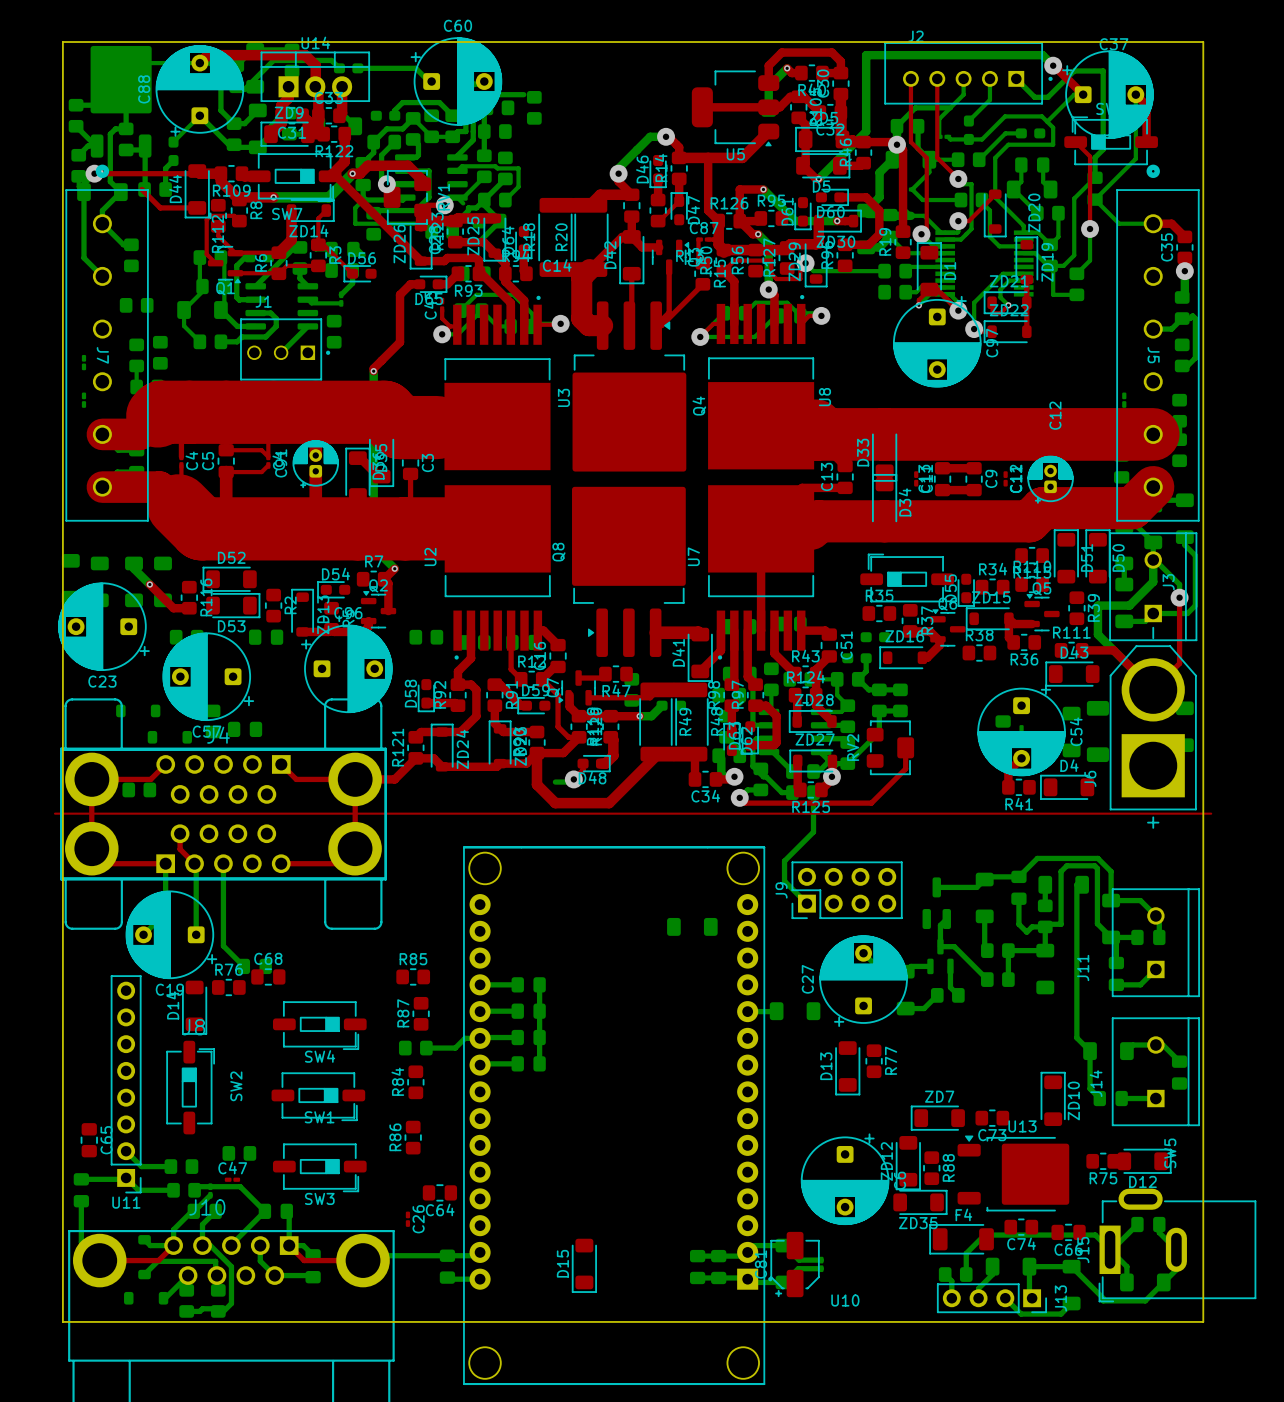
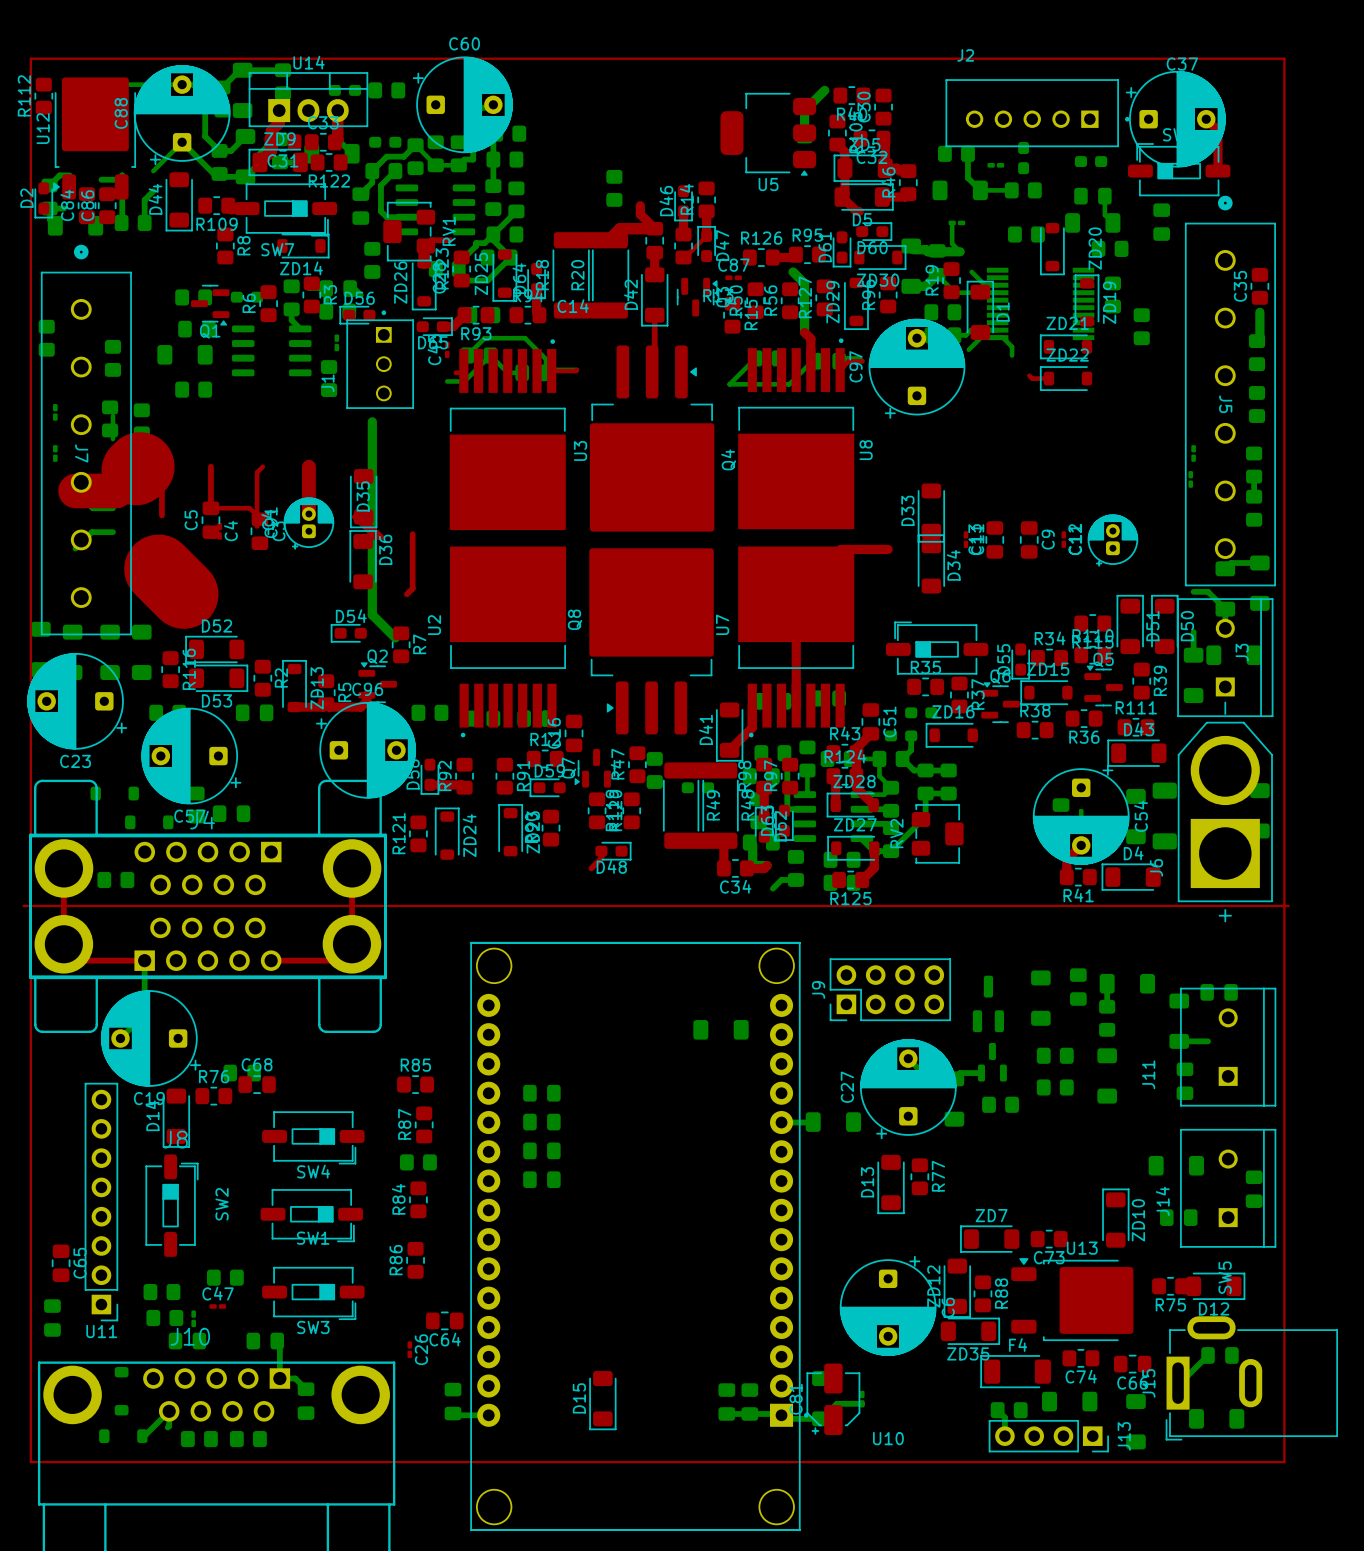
top track: none -> (30, 58) (1284, 58) (1284, 1462) (30, 1462) (30, 58)
board edge: (62, 42) (1203, 42) (1203, 1321) (62, 1321) (62, 42) -> none
top track: (199, 63) (207, 55) (305, 55) (315, 65) (315, 86) (318, 89) (318, 128) (323, 134) (307, 134) (307, 121) (302, 115) -> none
top track: (1053, 65) (1083, 94) -> none
bottom track: (1053, 65) (1042, 55) (866, 55) (866, 131) (818, 178) -> none
via: (1053, 65) -> none
bottom track: (339, 68) (331, 60) (273, 60) (244, 89) (236, 89) -> none
bottom track: (357, 68) (415, 68) (431, 84) -> none
part: none -> (386, 90)
top track: (787, 68) (791, 73) (801, 73) -> none
via: (787, 68) -> none
top track: (822, 73) (840, 73) (840, 61) (831, 52) (781, 52) (768, 65) (768, 83) -> none
J2 position: (968, 73) -> (1037, 113)
top track: (910, 78) (910, 142) (926, 157) (926, 228) (921, 234) -> none
top track: (937, 78) (937, 157) (958, 178) -> none
bottom track: (963, 78) (963, 94) (939, 119) (939, 136) -> none
bottom track: (989, 78) (989, 99) (968, 121) -> none
bottom track: (1016, 78) (1034, 97) (1047, 97) (1074, 70) (1103, 70) (1103, 149) (1095, 157) (1095, 177) (1074, 198) (1074, 255) (1063, 265) (1047, 265) (1035, 253) (1023, 253) -> none
bottom track: (523, 94) (479, 94) (473, 100) (473, 139) (457, 157) -> none
top track: (840, 94) (840, 138) (844, 142) (895, 142) (903, 149) (903, 231) -> none
bottom track: (1083, 94) (1074, 94) (1047, 121) -> none
bottom track: (1135, 94) (1135, 158) (1095, 199) (1119, 223) (1153, 223) -> none
U12 side: bottom (121, 101) -> top (94, 138)
bottom track: (76, 105) (95, 105) (121, 79) (126, 84) (126, 128) (115, 128) (110, 134) (110, 181) (120, 192) (102, 210) (102, 223) (123, 244) (131, 244) -> none
part: (534, 107) -> none
top track: (702, 107) (779, 107) (790, 96) (804, 96) (819, 112) -> none
bottom track: (950, 107) (915, 107) (896, 126) (896, 144) (892, 149) (892, 159) -> none
C86 side: bottom (76, 115) -> top (107, 205)
bottom track: (394, 115) (394, 110) (402, 102) (439, 102) (452, 115) -> none
bottom track: (76, 126) (95, 146) -> none
top track: (768, 131) (742, 157) (679, 157) (679, 147) (668, 136) (666, 136) -> none
bottom track: (1021, 133) (1005, 133) (979, 159) -> none
top track: (344, 134) (344, 161) (330, 176) (336, 176) (421, 261) (444, 261) (447, 257) (476, 257) (479, 260) (479, 273) (481, 273) (510, 302) (510, 324) -> none
bottom track: (666, 136) (650, 136) (618, 168) (618, 173) -> none
via: (666, 136) -> none
bottom track: (947, 136) (950, 139) (982, 139) (1005, 116) (1041, 116) (1053, 127) (1053, 144) (1008, 144) (995, 157) (995, 197) (1023, 225) (1023, 232) (1038, 232) (1050, 244) (1058, 236) (1058, 213) -> none
C84 side: bottom (126, 139) -> top (87, 205)
bottom track: (413, 139) (418, 144) (418, 155) (416, 157) (405, 157) -> none
top track: (1075, 142) (1090, 156) (1090, 228) -> none
via: (896, 144) -> none
D2 side: bottom (173, 151) -> top (43, 200)
part: none -> (614, 188)
top track: (708, 157) (708, 210) (718, 221) (718, 244) (723, 250) (713, 239) (708, 239) -> none
bottom track: (892, 159) (879, 172) (879, 197) (866, 210) -> none
bottom track: (929, 159) (929, 172) (912, 189) (922, 200) (958, 200) -> none
bottom track: (1021, 164) (1021, 181) (1013, 189) (1037, 213) -> none
bottom track: (405, 170) (428, 171) (428, 197) (415, 210) (373, 210) -> none
bottom track: (457, 170) (461, 166) (518, 168) (518, 186) (505, 200) -> none
top track: (94, 173) (194, 173) (197, 171) (199, 173) (220, 173) (220, 181) (239, 200) (242, 197) (273, 197) -> none
bottom track: (94, 173) (83, 184) (83, 257) (102, 276) -> none
via: (94, 173) -> none
top track: (352, 173) (359, 173) (367, 165) (407, 165) (422, 180) (422, 184) -> none
bottom track: (352, 173) (328, 197) (273, 197) -> none
via: (352, 173) -> none
via: (618, 173) -> none
bottom track: (484, 176) (463, 197) (457, 197) -> none
via: (818, 178) -> none
bottom track: (958, 178) (963, 184) (971, 184) (971, 228) (960, 239) (945, 239) -> none
via: (958, 178) -> none
via: (386, 184) -> none
bottom track: (363, 185) (363, 197) (365, 200) (402, 200) (405, 197) -> none
top track: (141, 189) (160, 207) (197, 207) -> none
top track: (763, 189) (739, 189) (739, 221) (752, 234) (758, 234) -> none
bottom track: (763, 189) (795, 221) (837, 221) -> none
via: (763, 189) -> none
D44 position: (197, 191) -> (179, 201)
top track: (995, 194) (968, 221) (958, 221) -> none
via: (273, 197) -> none
bottom track: (457, 197) (463, 203) -> none
top track: (839, 197) (866, 197) (879, 210) (879, 234) (868, 244) (845, 244) -> none
bottom track: (364, 198) (355, 207) (355, 223) (423, 223) (431, 231) -> none
bottom track: (979, 200) (989, 210) (989, 236) (999, 246) (1023, 246) -> none
via: (444, 205) -> none
top track: (291, 210) (291, 240) (278, 252) (235, 253) (218, 236) (218, 226) -> none
top track: (326, 210) (318, 218) (318, 244) (323, 244) (352, 273) -> none
top track: (422, 210) (433, 221) (455, 221) (457, 218) (494, 218) -> none
R112 position: (218, 215) -> (43, 96)
bottom track: (910, 215) (924, 215) (940, 232) (957, 232) (958, 221) -> none
top track: (239, 221) (234, 215) (210, 215) (206, 219) (206, 254) (215, 263) -> none
top track: (818, 221) (818, 241) (816, 244) (790, 244) (787, 247) -> none
top track: (837, 221) (853, 221) -> none
via: (837, 221) -> none
via: (958, 221) -> none
top track: (1153, 223) (1171, 223) (1184, 236) -> none
bottom track: (1090, 228) (1090, 260) (1076, 273) -> none
via: (1090, 228) -> none
R112 name position: R112 (217, 234) -> R112 (24, 95)
via: (758, 234) -> none
via: (921, 234) -> none
top track: (698, 239) (698, 258) (702, 263) -> none
top track: (455, 242) (483, 242) (505, 263) (505, 281) (524, 300) (524, 324) -> none
bottom track: (299, 247) (294, 247) (255, 286) -> none
top track: (659, 247) (642, 247) (631, 236) (622, 236) (581, 277) (581, 318) (588, 325) (602, 325) -> none
top track: (787, 250) (726, 250) (723, 252) -> none
part: (131, 255) -> none
bottom track: (199, 257) (199, 283) (202, 286) (202, 291) (184, 310) (184, 326) (199, 341) -> none
bottom track: (220, 257) (224, 260) (224, 306) (220, 310) (237, 326) (255, 326) -> none
bottom track: (249, 257) (245, 257) (236, 265) (236, 297) (239, 300) (255, 299) -> none
top track: (805, 263) (800, 268) (800, 279) (776, 279) (771, 273) (771, 260) (734, 260) (723, 271) (734, 281) (734, 323) -> none
bottom track: (805, 263) (813, 271) (884, 271) -> none
via: (805, 263) -> none
top track: (318, 265) (286, 265) (278, 273) (235, 273) -> none
bottom track: (1050, 265) (1053, 268) (1053, 294) (1076, 294) -> none
bottom track: (945, 266) (909, 266) (905, 271) -> none
top track: (669, 267) (669, 312) (656, 325) (661, 325) (702, 284) -> none
bottom track: (352, 270) (352, 283) (341, 294) -> none
via: (1184, 271) -> none
bottom track: (1023, 273) (1003, 273) (974, 302) (974, 329) -> none
top track: (1026, 279) (1026, 331) -> none
bottom track: (1023, 280) (1009, 280) (1000, 289) (1000, 297) (1008, 305) -> none
top track: (419, 284) (410, 284) (400, 294) (400, 342) (373, 368) (373, 371) -> none
via: (768, 289) -> none
part: none -> (46, 338)
bottom track: (307, 299) (311, 303) (341, 303) -> none
top track: (992, 302) (992, 313) (1000, 313) (1008, 305) -> none
part rotation: 0° (136, 305) -> 90° clockwise (112, 358)
top track: (918, 305) (918, 300) (929, 289) (937, 289) (958, 310) -> none
via: (918, 305) -> none
via: (1008, 305) -> none
top track: (442, 309) (442, 318) (450, 326) (442, 334) -> none
via: (958, 310) -> none
bottom track: (255, 313) (270, 313) (276, 318) (276, 326) (265, 336) (242, 336) (237, 341) (220, 341) -> none
bottom track: (745, 313) (755, 302) (787, 302) (800, 315) -> none
via: (821, 315) -> none
via: (560, 323) -> none
top track: (720, 323) (713, 323) (700, 336) -> none
bottom track: (307, 326) (281, 352) -> none
via: (974, 329) -> none
bottom track: (1153, 329) (1171, 329) (1182, 318) (1190, 318) (1192, 315) (1195, 318) (1195, 358) (1187, 365) (1182, 365) -> none
via: (442, 334) -> none
via: (700, 336) -> none
C97 rotation: 0° (937, 341) -> 180° (916, 368)
C97 position: (937, 341) -> (916, 368)
J7 position: (107, 343) -> (86, 440)
J1 rotation: 0° (285, 349) -> 90° counterclockwise (380, 359)
J1 position: (285, 349) -> (380, 359)
part: (160, 352) -> none
part: (136, 355) -> none
part: none -> (110, 418)
part: none -> (141, 421)
via: (373, 371) -> none
part: (147, 387) -> none
top track: (161, 412) (384, 412) (399, 427) (436, 427) -> none
text: C12 (1055, 415) -> none
top track: (816, 425) (816, 434) (1153, 434) -> none
D35 position: (381, 459) -> (363, 498)
part: (136, 461) -> none
C4 position: (181, 461) -> (219, 531)
C3 position: (410, 462) -> (259, 531)
top track: (181, 465) (181, 487) (159, 487) -> none
top track: (268, 465) (261, 472) (226, 472) (226, 500) -> none
part: (1121, 466) -> none
top track: (942, 468) (974, 468) -> none
top track: (315, 471) (315, 500) -> none
D36 position: (357, 474) -> (363, 559)
C13: (845, 476) -> none
top track: (102, 487) (159, 487) -> none
top track: (159, 487) (201, 528) (466, 528) -> none
top track: (1153, 487) (1132, 508) (1042, 508) (1029, 521) (818, 521) (810, 528) -> none
top track: (942, 490) (974, 490) -> none
bottom track: (1184, 537) (1184, 545) (1195, 555) (1195, 605) (1187, 613) (1153, 613) (1145, 621) (1124, 621) -> none
part rotation: 0° (1124, 545) -> 90° clockwise (1233, 655)
part position: (1124, 545) -> (1233, 655)
bottom track: (134, 563) (134, 568) (149, 584) -> none
top track: (394, 568) (384, 579) (388, 583) (388, 611) -> none
via: (394, 568) -> none
SW5 position: (907, 578) -> (937, 648)
R7 rotation: 0° (373, 579) -> 90° clockwise (401, 644)
R7 position: (373, 579) -> (401, 644)
top track: (149, 584) (173, 608) (189, 608) -> none
via: (149, 584) -> none
D54 position: (333, 589) -> (348, 633)
top track: (1179, 597) (1179, 663) (1153, 689) (1113, 650) (1082, 650) -> none
bottom track: (1179, 597) (1179, 584) (1153, 559) (1153, 581) (1129, 605) (1097, 605) (1097, 634) (1153, 689) -> none
via: (1179, 597) -> none
top track: (1032, 624) (1014, 624) (1008, 618) (1008, 637) (1013, 642) -> none
top track: (470, 630) (471, 658) (457, 671) (457, 684) (471, 684) (476, 689) (476, 716) (460, 732) (421, 732) (415, 737) -> none
top track: (511, 630) (511, 669) (521, 679) -> none
top track: (537, 630) (543, 630) (558, 645) -> none
top track: (734, 630) (734, 682) (731, 684) -> none
top track: (747, 630) (747, 676) (755, 684) -> none
top track: (774, 630) (774, 653) (795, 674) -> none
top track: (801, 630) (825, 630) (829, 634) -> none
top track: (910, 631) (930, 631) (939, 641) (939, 645) (927, 657) (922, 657) -> none
top track: (655, 632) (698, 632) (700, 634) -> none
top track: (558, 666) (554, 666) (542, 679) (558, 695) (558, 726) (568, 737) (579, 737) (563, 753) (536, 753) -> none
C96 position: (346, 668) -> (366, 750)
top track: (605, 674) (601, 678) (578, 678) -> none
R47 rotation: 0° (615, 674) -> 90° clockwise (637, 764)
top track: (494, 684) (500, 684) (521, 705) (526, 705) -> none
top track: (658, 689) (650, 697) (588, 697) -> none
top track: (569, 695) (569, 706) (579, 716) (639, 716) -> none
top track: (494, 705) (494, 723) (503, 732) (536, 732) -> none
bottom track: (662, 705) (651, 716) (639, 716) -> none
top track: (755, 705) (766, 705) (776, 716) (776, 742) (774, 745) (750, 745) -> none
via: (639, 716) -> none
top track: (610, 737) (613, 739) (613, 755) (605, 763) (601, 763) -> none
bottom track: (769, 738) (756, 738) (752, 742) (752, 766) (781, 792) (795, 792) -> none
top track: (905, 747) (905, 768) (871, 803) (745, 803) (739, 797) -> none
bottom track: (769, 752) (773, 752) (792, 771) -> none
top track: (536, 753) (526, 763) (500, 763) (496, 766) (442, 766) (433, 758) (415, 758) (394, 779) (296, 779) (281, 764) -> none
top track: (536, 753) (536, 784) (555, 803) (609, 803) (658, 754) -> none
top track: (797, 760) (797, 787) (800, 789) -> none
bottom track: (830, 762) (827, 762) (816, 774) -> none
top track: (165, 764) (150, 779) (91, 779) -> none
via: (734, 776) -> none
bottom track: (831, 776) (816, 792) (813, 792) (813, 832) (784, 861) (784, 881) (806, 903) -> none
via: (831, 776) -> none
bottom track: (573, 779) (571, 782) (555, 782) -> none
via: (573, 779) -> none
via: (739, 797) -> none
top track: (180, 833) (180, 849) (194, 863) -> none
bottom track: (194, 863) (196, 865) (196, 934) -> none
bottom track: (223, 863) (223, 945) (243, 966) -> none
bottom track: (1082, 879) (1076, 884) (1076, 1037) (1090, 1051) (1090, 1088) (1099, 1098) -> none
bottom track: (936, 887) (976, 887) (987, 876) (1018, 876) (1037, 858) (1097, 858) (1111, 871) (1111, 900) (1140, 900) (1159, 919) (1159, 937) -> none
bottom track: (1018, 898) (1018, 924) (1026, 932) (1032, 926) (1045, 926) -> none
bottom track: (984, 916) (984, 947) (987, 950) -> none
bottom track: (946, 919) (940, 925) (940, 946) (954, 946) (987, 979) -> none
bottom track: (1045, 926) (1045, 950) (1008, 950) (1008, 979) -> none
bottom track: (1045, 926) (1047, 924) (1061, 924) (1061, 871) (1066, 865) (1094, 865) (1097, 868) (1097, 923) (1116, 942) (1116, 962) -> none
part position: (1148, 937) -> (1219, 992)
bottom track: (950, 966) (950, 987) (958, 995) -> none
bottom track: (1155, 969) (1140, 984) (1116, 984) -> none
bottom track: (480, 984) (517, 984) -> none
bottom track: (539, 984) (539, 1063) -> none
bottom track: (937, 995) (924, 1008) (905, 1008) -> none
bottom track: (517, 1011) (480, 1011) -> none
bottom track: (517, 1037) (465, 1038) (455, 1048) (426, 1048) -> none
bottom track: (1126, 1051) (1133, 1045) (1162, 1045) (1179, 1061) -> none
bottom track: (517, 1063) (480, 1065) -> none
bottom track: (1121, 1098) (1155, 1098) -> none
bottom track: (126, 1151) (141, 1166) (170, 1166) -> none
bottom track: (81, 1179) (126, 1177) (138, 1190) (173, 1190) -> none
bottom track: (194, 1190) (198, 1186) (240, 1186) (264, 1211) (231, 1245) -> none
bottom track: (210, 1195) (173, 1229) (173, 1245) (150, 1245) (144, 1239) -> none
bottom track: (81, 1201) (81, 1242) (99, 1260) -> none
bottom track: (215, 1211) (202, 1224) (202, 1245) (210, 1245) (231, 1266) (231, 1303) (223, 1311) (218, 1311) (215, 1308) (186, 1311) -> none
bottom track: (1159, 1224) (1159, 1232) (1176, 1249) (1176, 1269) (1145, 1300) (1103, 1300) (1103, 1298) (1071, 1266) (1029, 1266) (1029, 1295) (1032, 1298) -> none
top track: (173, 1245) (158, 1260) (99, 1260) -> none
bottom track: (260, 1245) (260, 1261) (274, 1275) (311, 1275) (313, 1277) -> none
top track: (289, 1245) (304, 1260) (363, 1260) -> none
bottom track: (480, 1252) (476, 1255) (367, 1255) (363, 1260) -> none
bottom track: (697, 1256) (743, 1256) (754, 1245) (784, 1245) (799, 1260) (821, 1260) -> none
bottom track: (992, 1266) (992, 1274) (978, 1288) (978, 1298) -> none
bottom track: (144, 1274) (157, 1261) (215, 1261) (218, 1290) -> none
bottom track: (966, 1274) (966, 1253) (984, 1235) (1095, 1235) (1126, 1266) (1126, 1282) -> none
bottom track: (1005, 1298) (1021, 1314) (1061, 1314) (1071, 1303) -> none
part rotation: 0° (186, 1300) -> 90° clockwise (248, 1439)
part position: (186, 1300) -> (248, 1439)
part rotation: 0° (218, 1300) -> 90° clockwise (199, 1439)

